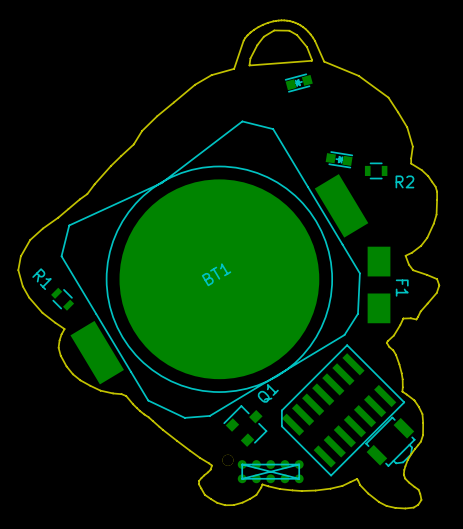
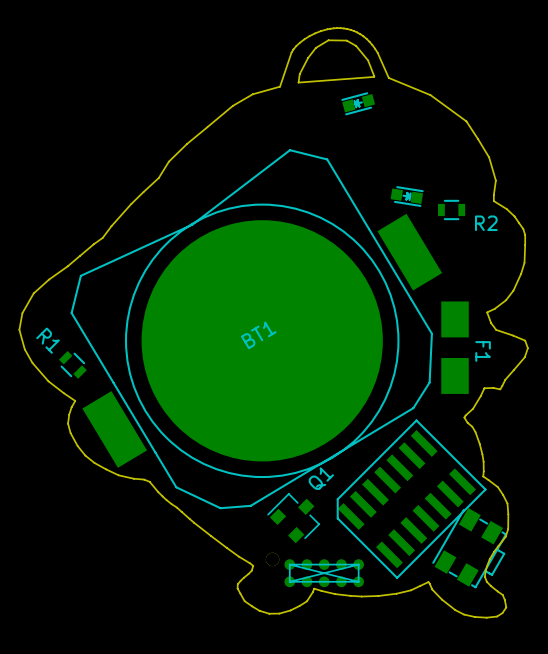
part footprint: [365, 416, 416, 467] -> [432, 508, 508, 589]

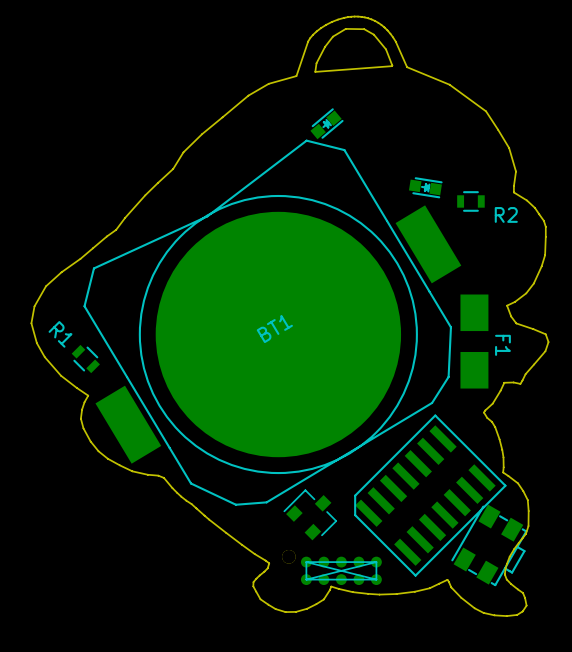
part: (358, 103) -> none
part: none -> (326, 123)
Q1 name: Q1 (321, 478) -> none

